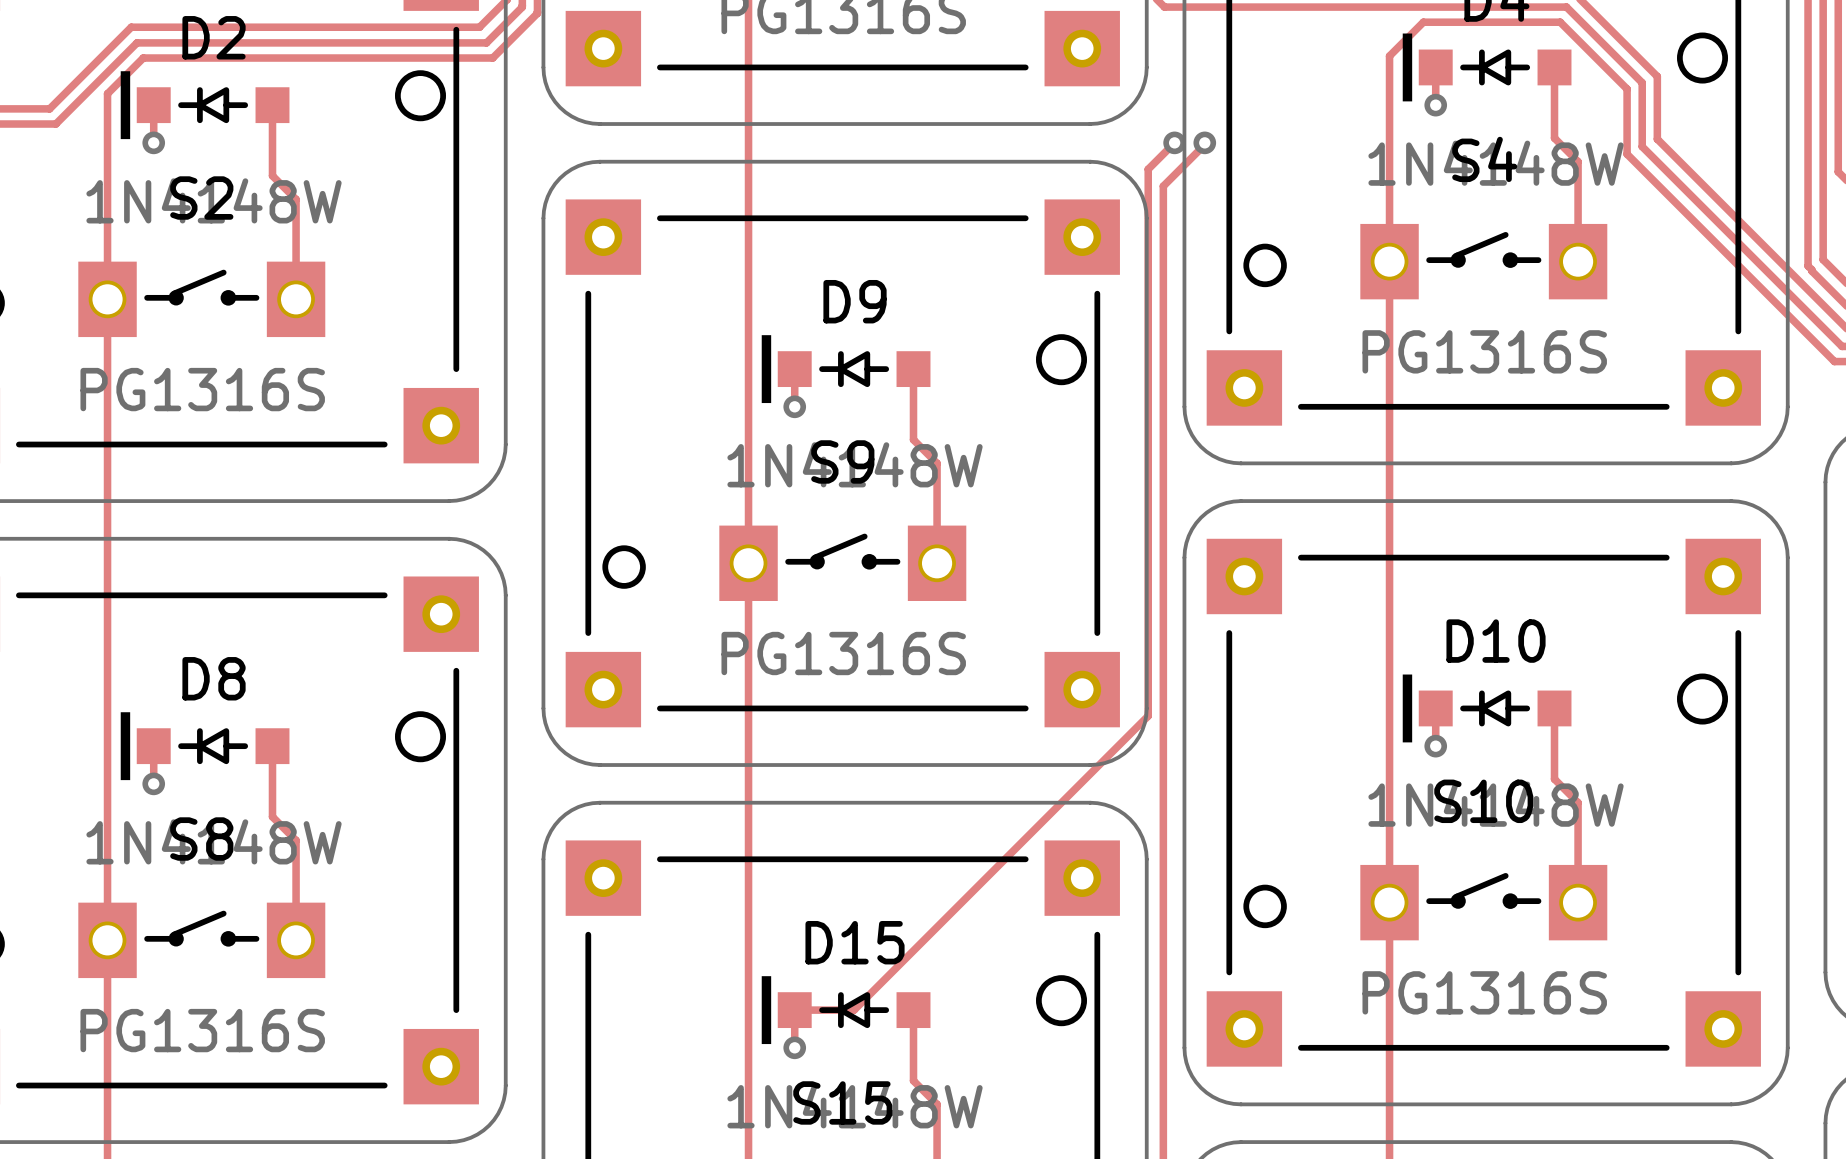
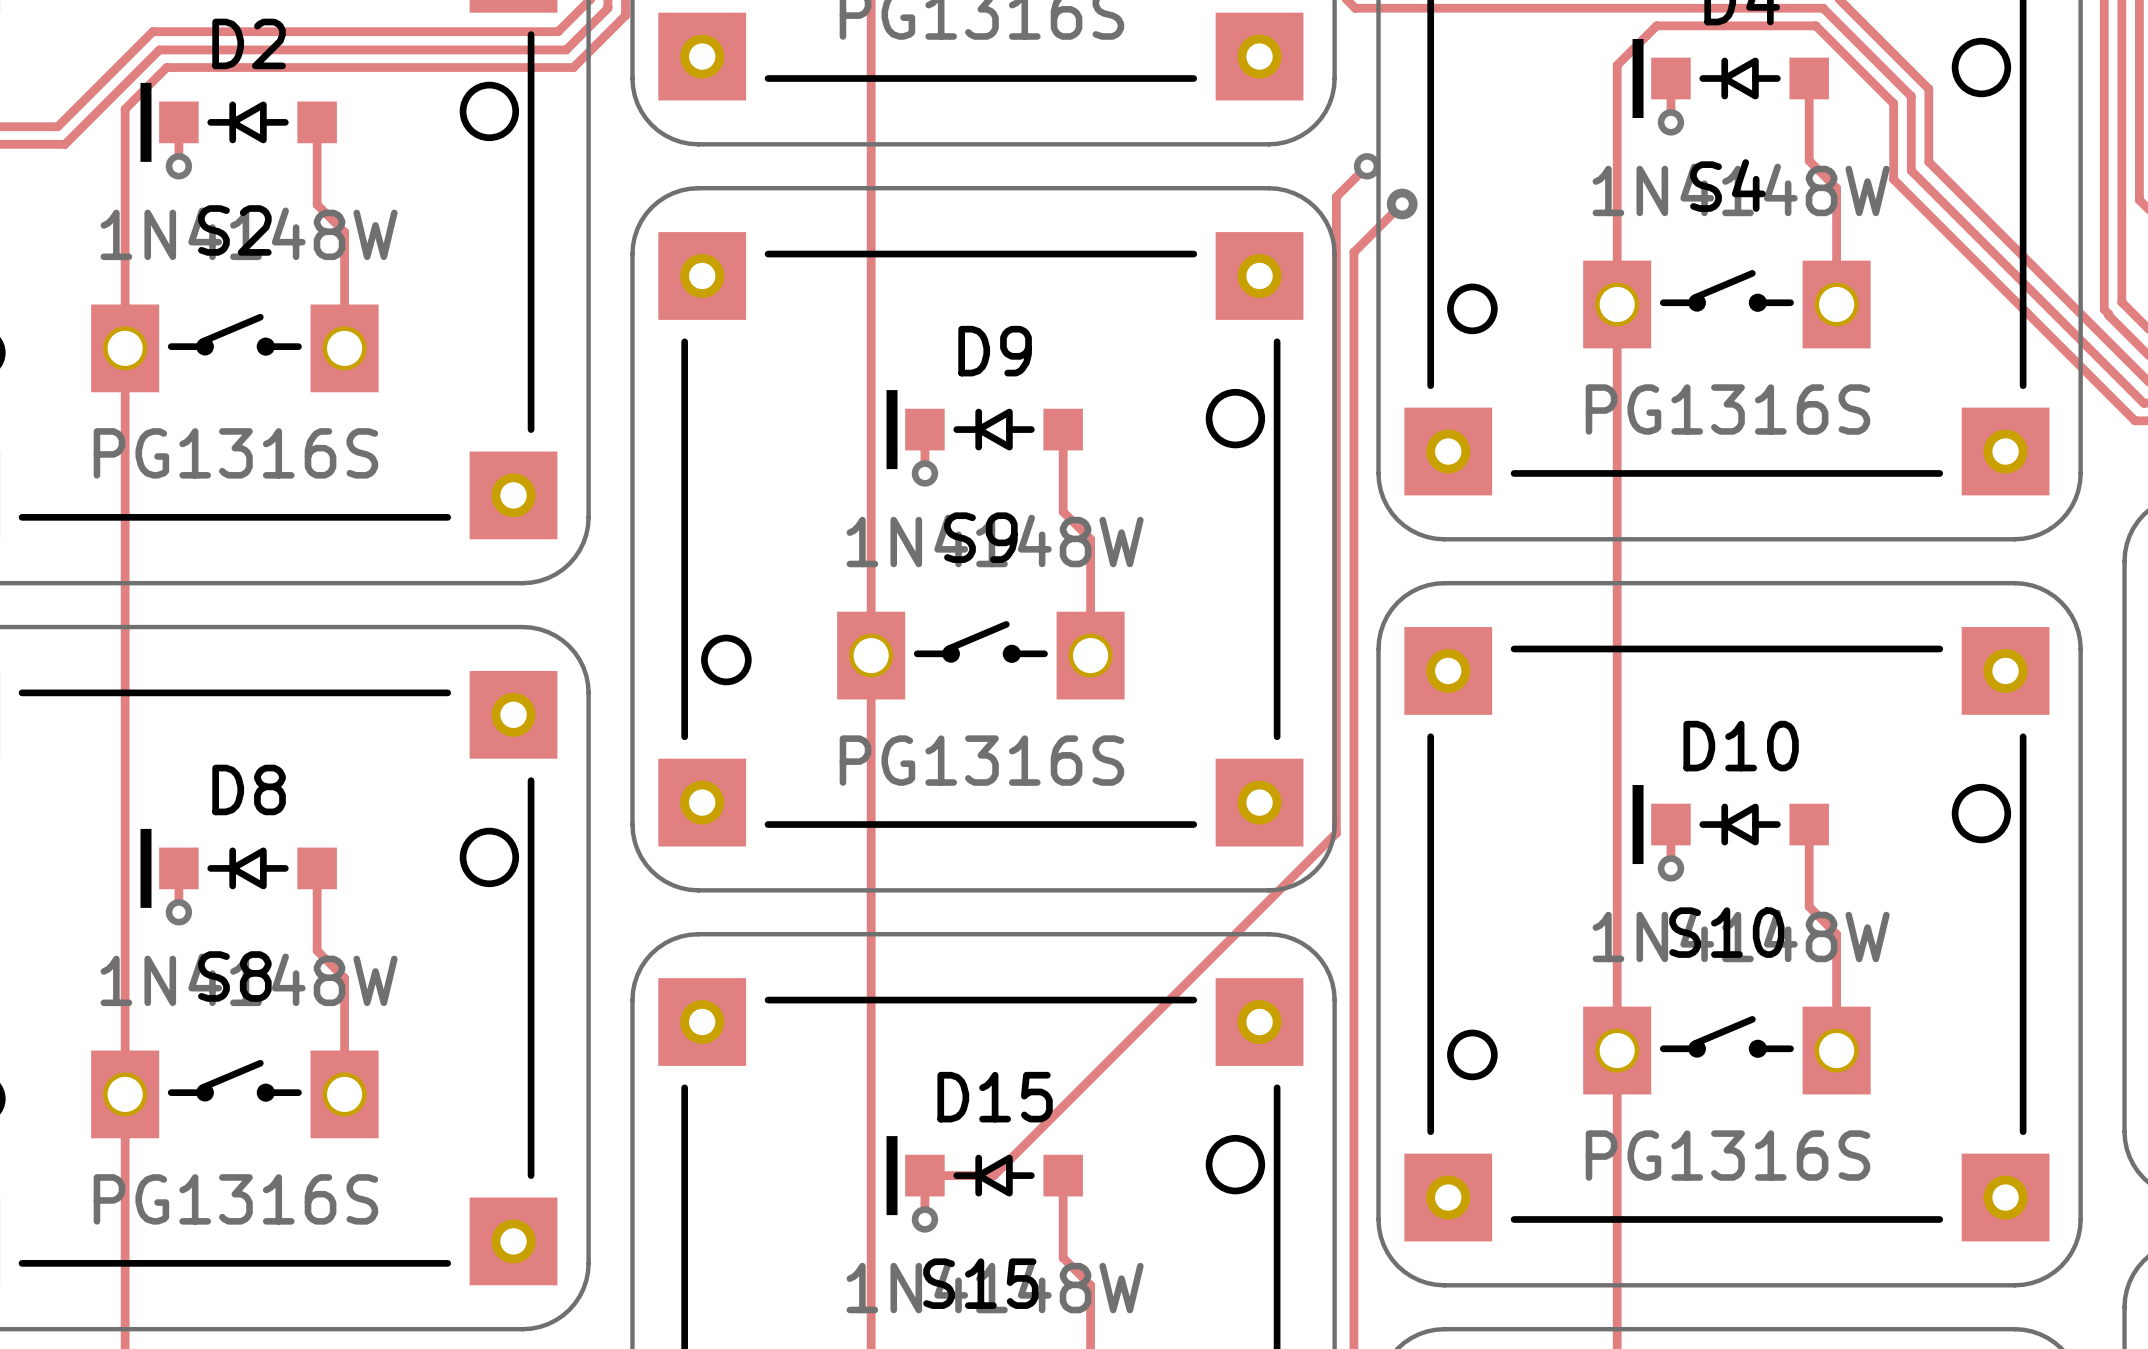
track: (1204, 142) (1163, 186) (1163, 216) -> (1402, 204) (1353, 252)
via: (1204, 142) -> none
via: none -> (1402, 204)

